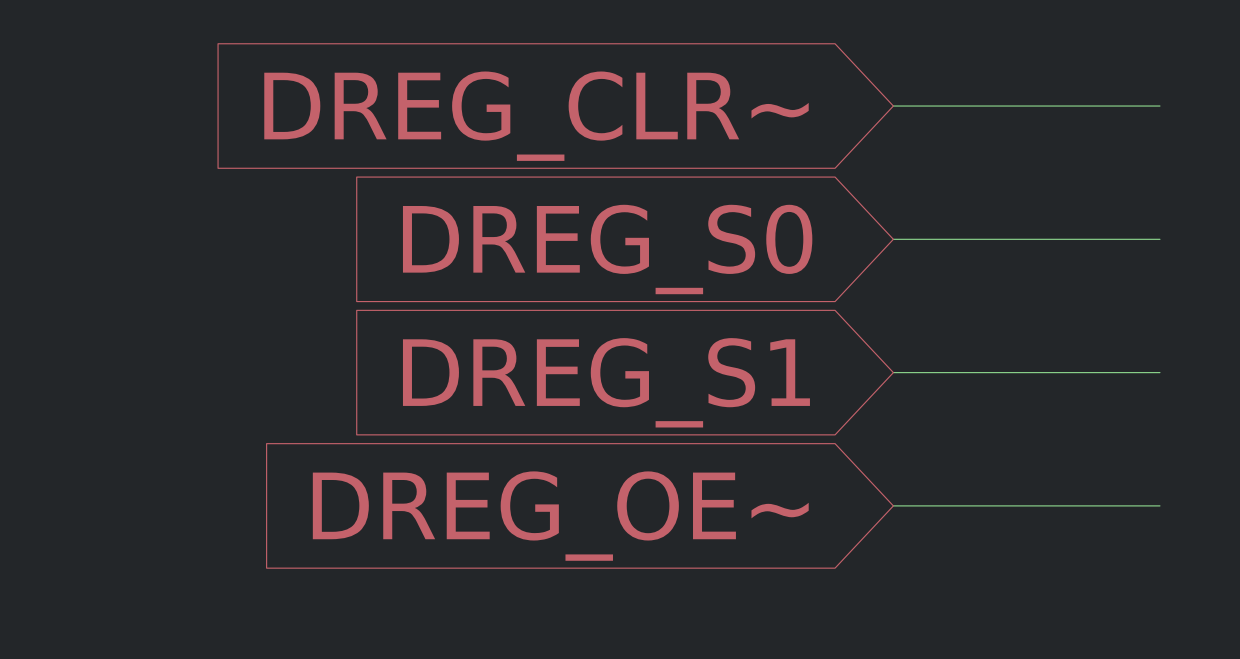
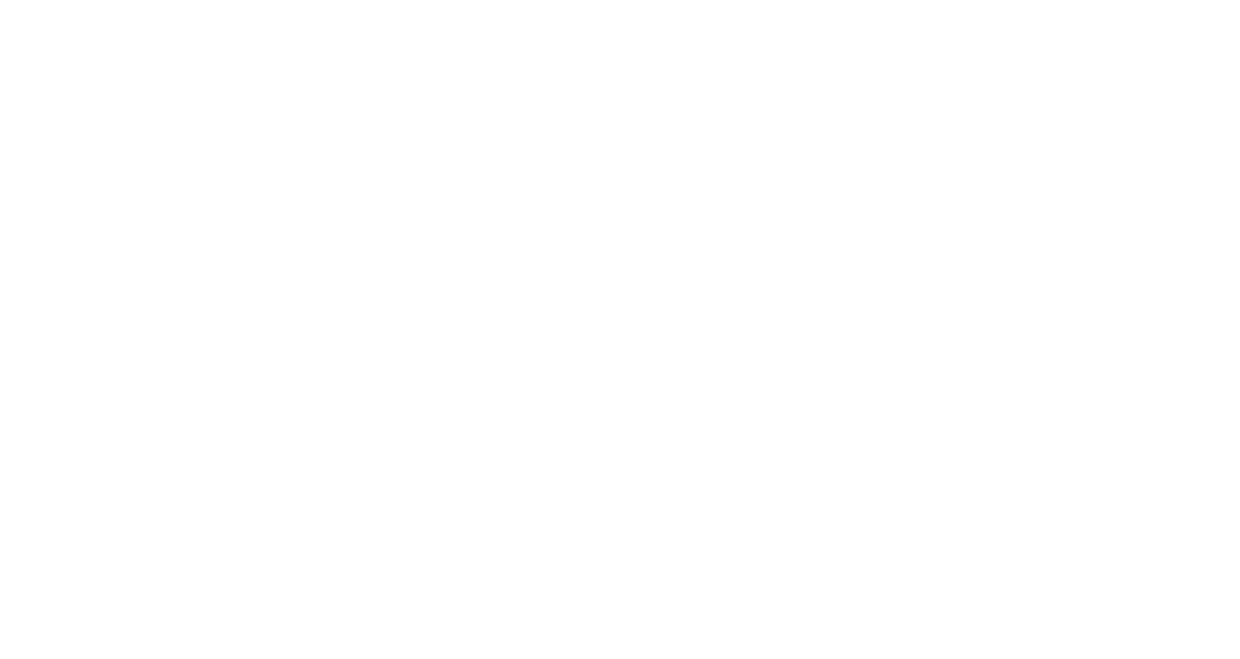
wire: (893, 106) (1159, 106) -> none
global label: DREG_CLR~ (536, 116) -> none
wire: (893, 239) (1159, 239) -> none
global label: DREG_S0 (607, 249) -> none
wire: (893, 372) (1159, 372) -> none
global label: DREG_S1 (606, 382) -> none
wire: (893, 505) (1159, 505) -> none
global label: DREG_OE~ (560, 516) -> none

